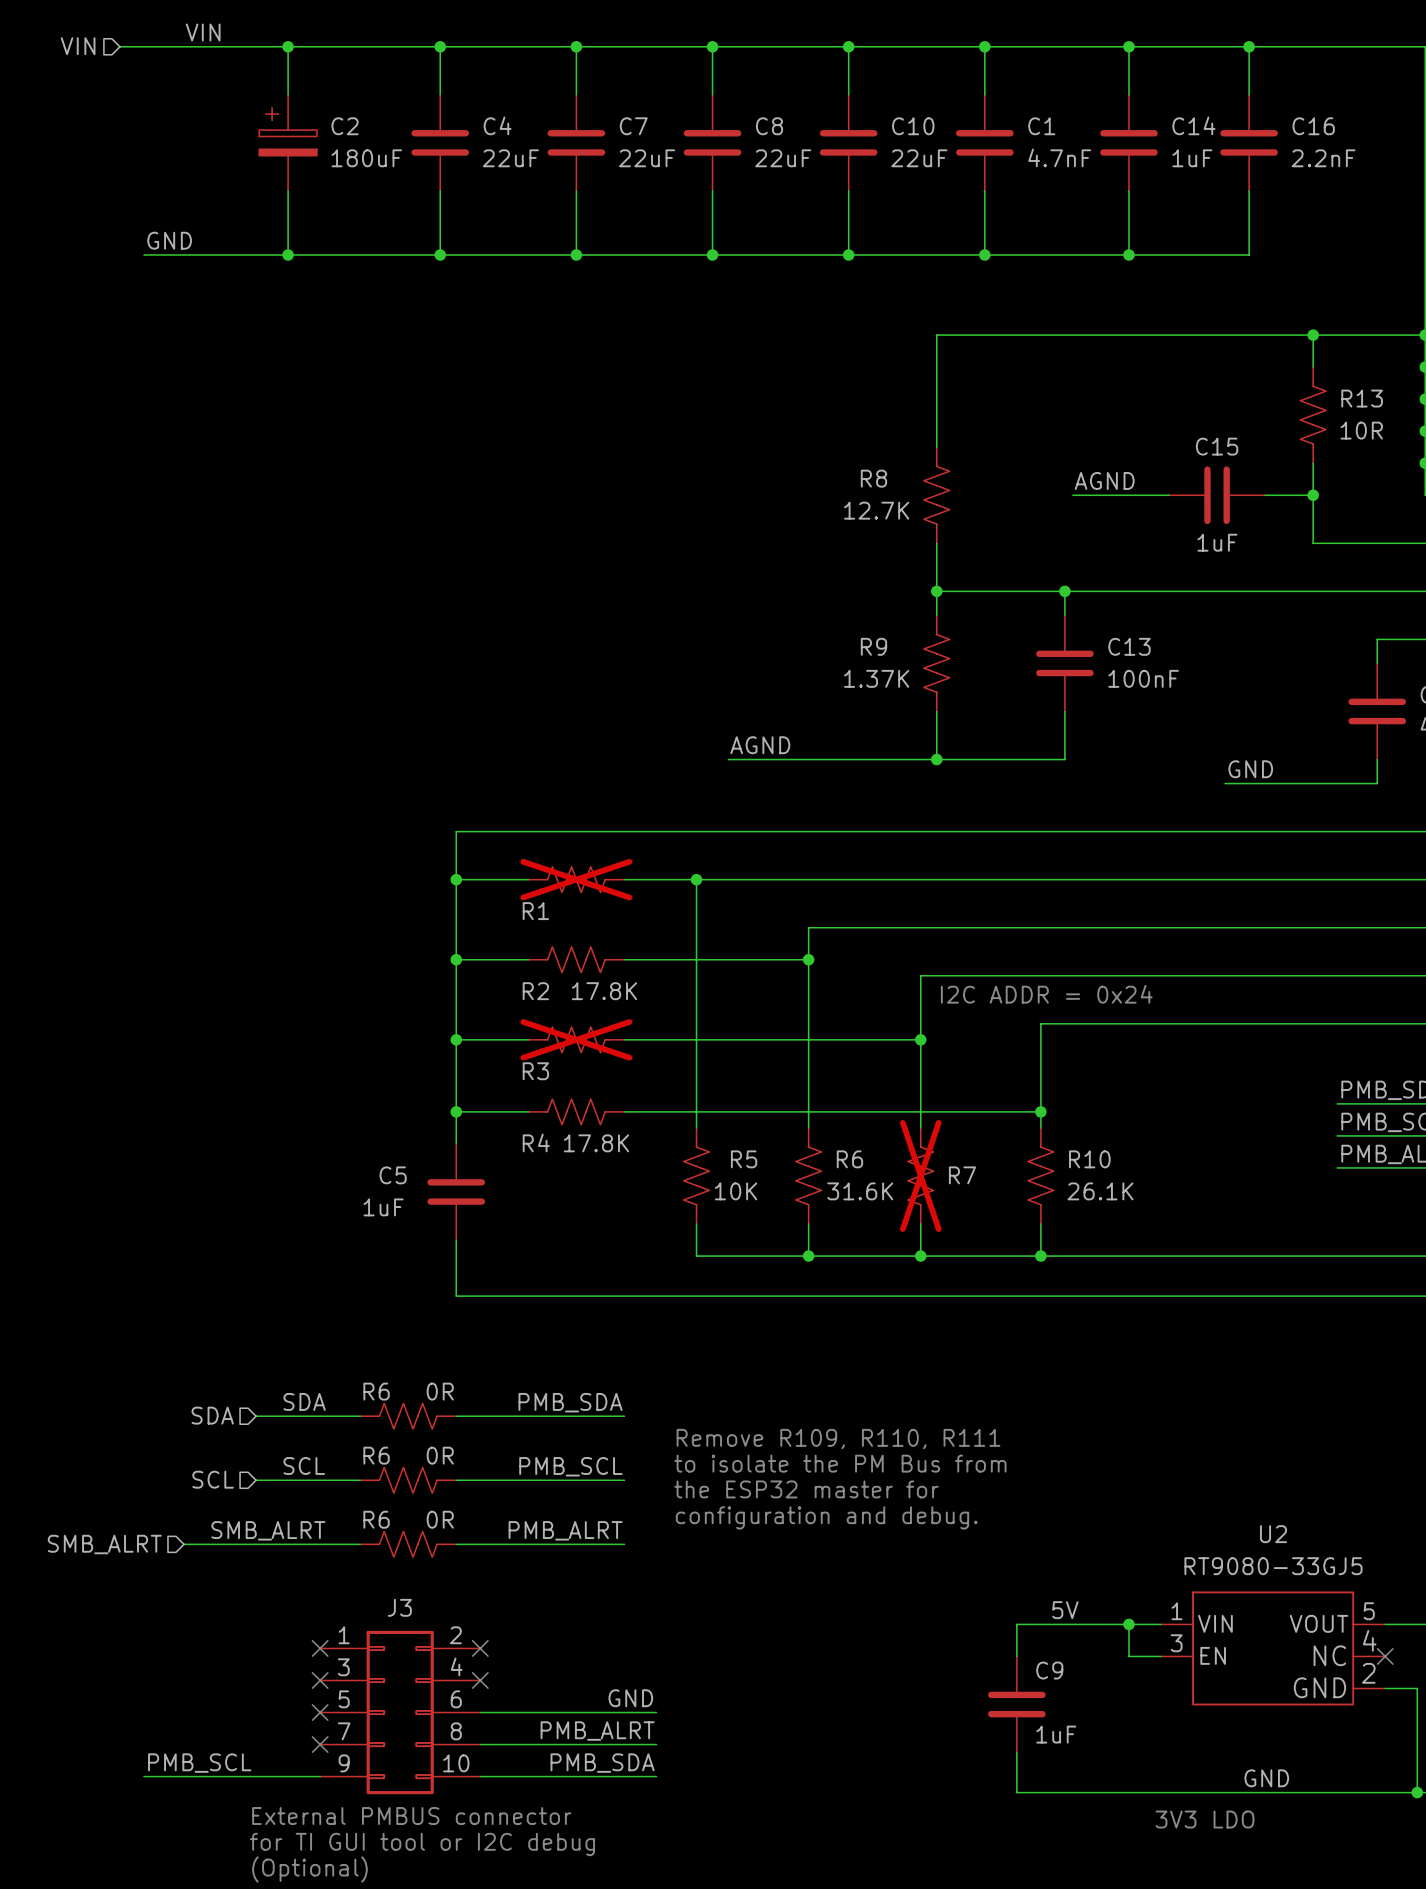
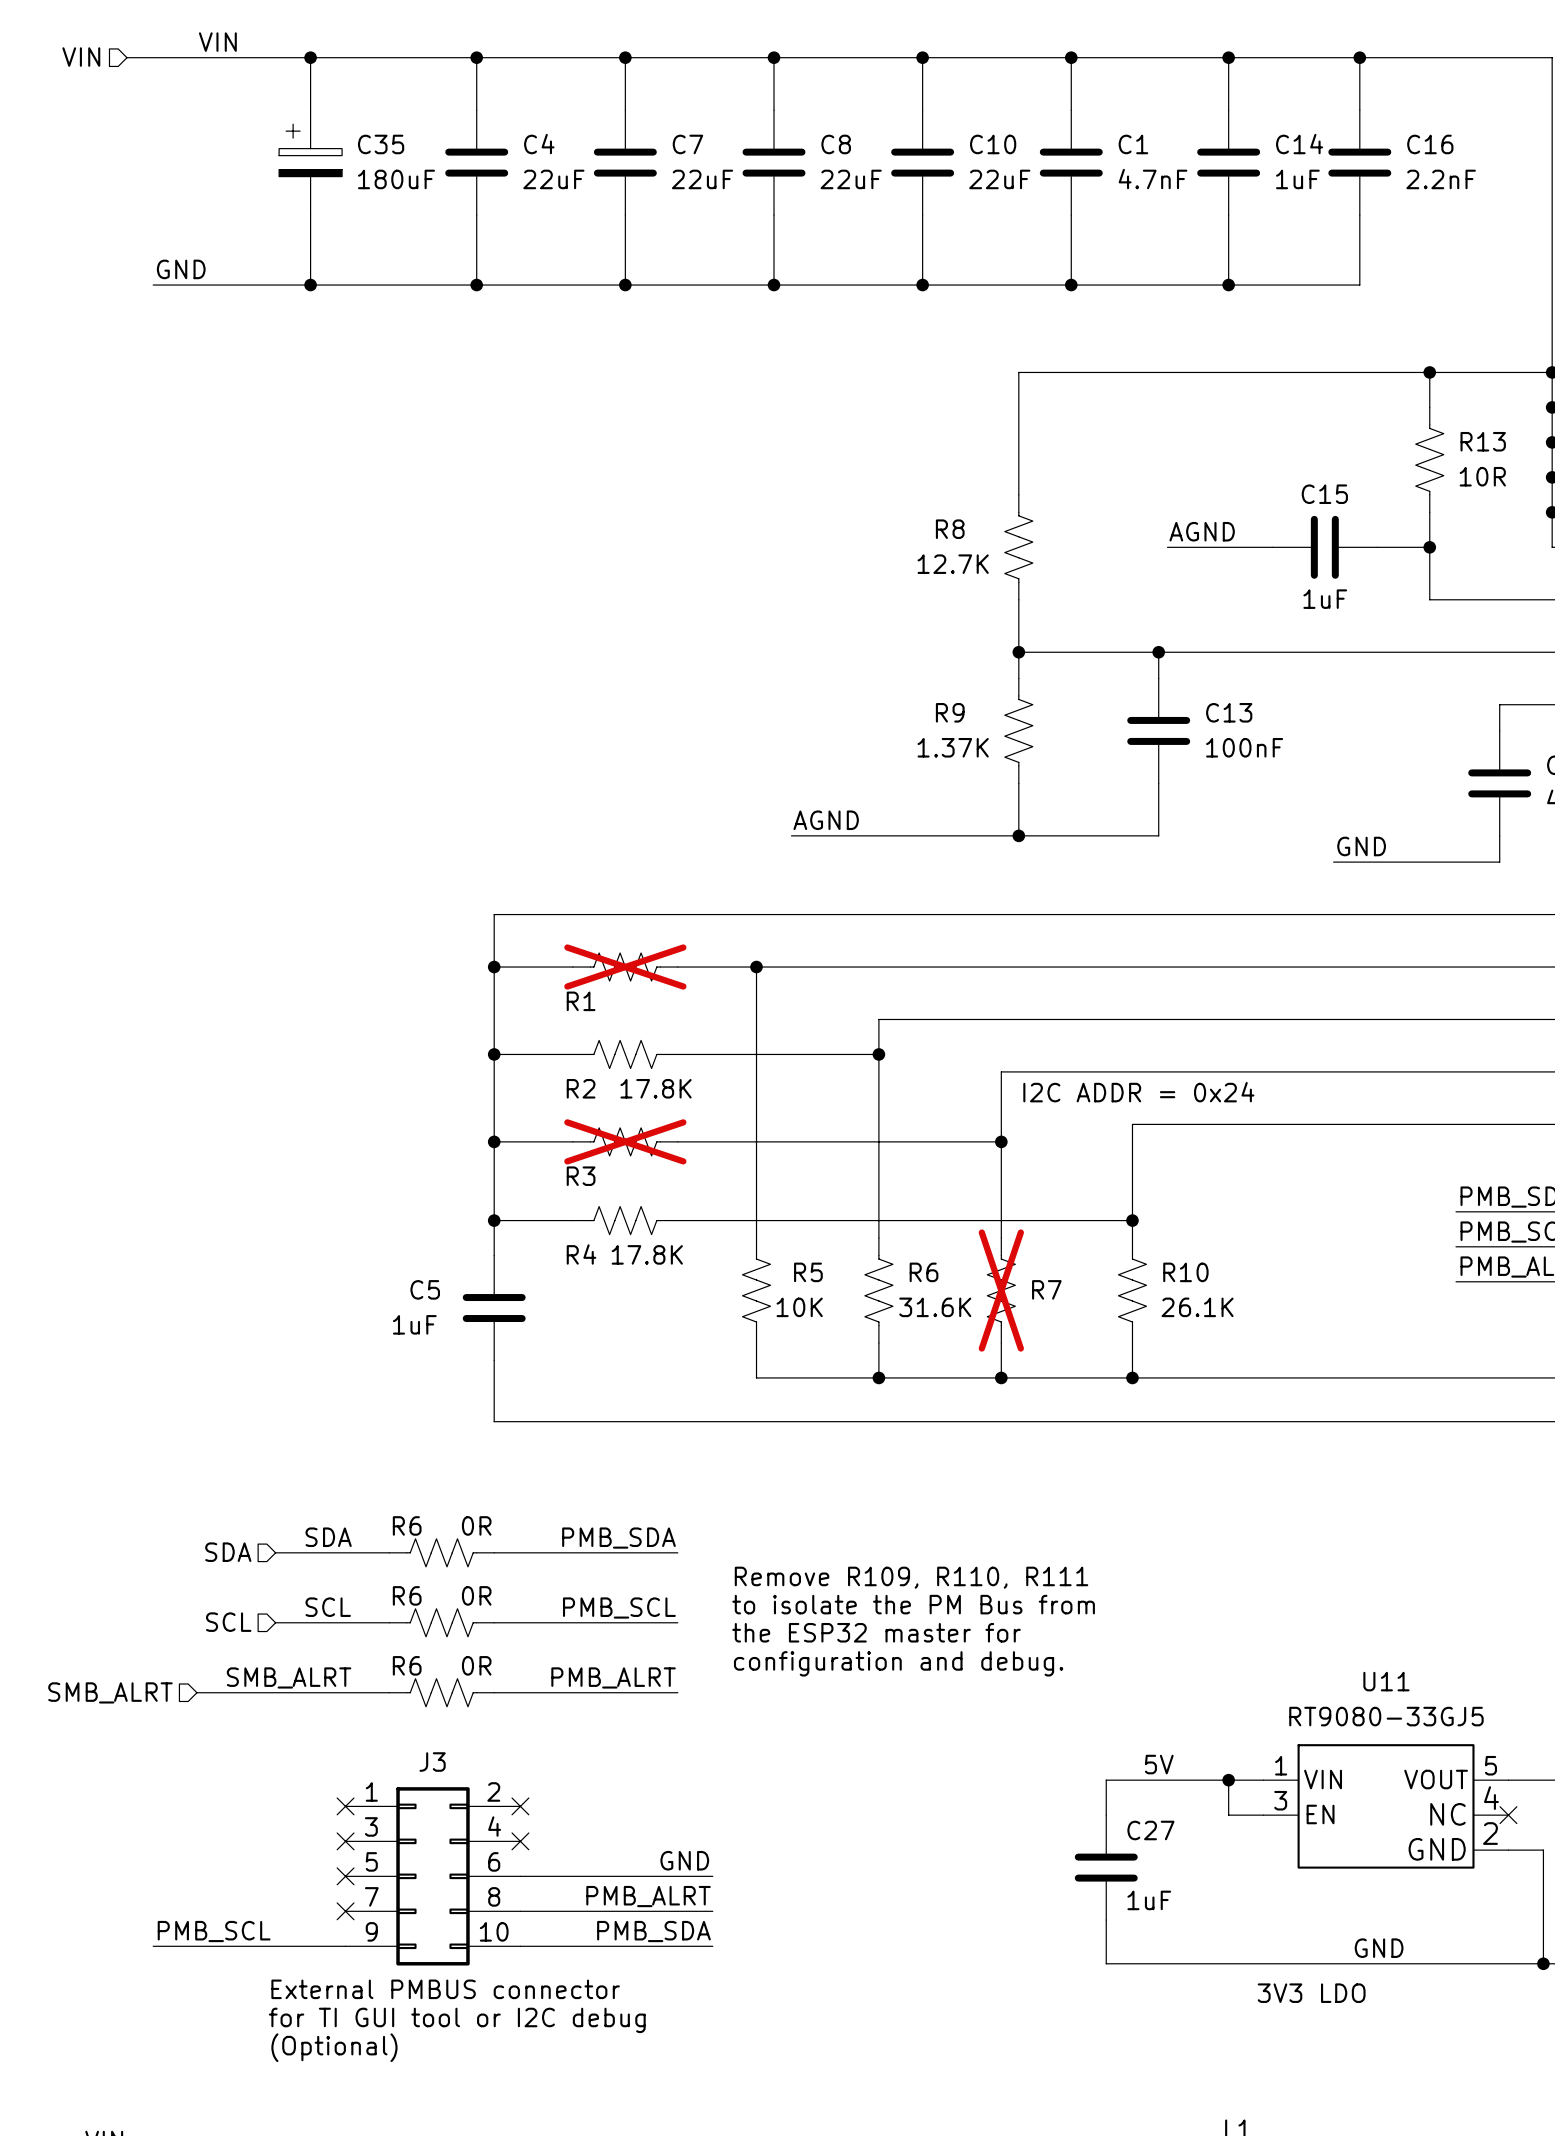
C2 name: C2 (345, 126) -> C35 (381, 144)
U2 name: U2 (1273, 1534) -> U11 (1386, 1681)
C9 name: C9 (1049, 1670) -> C27 (1150, 1830)

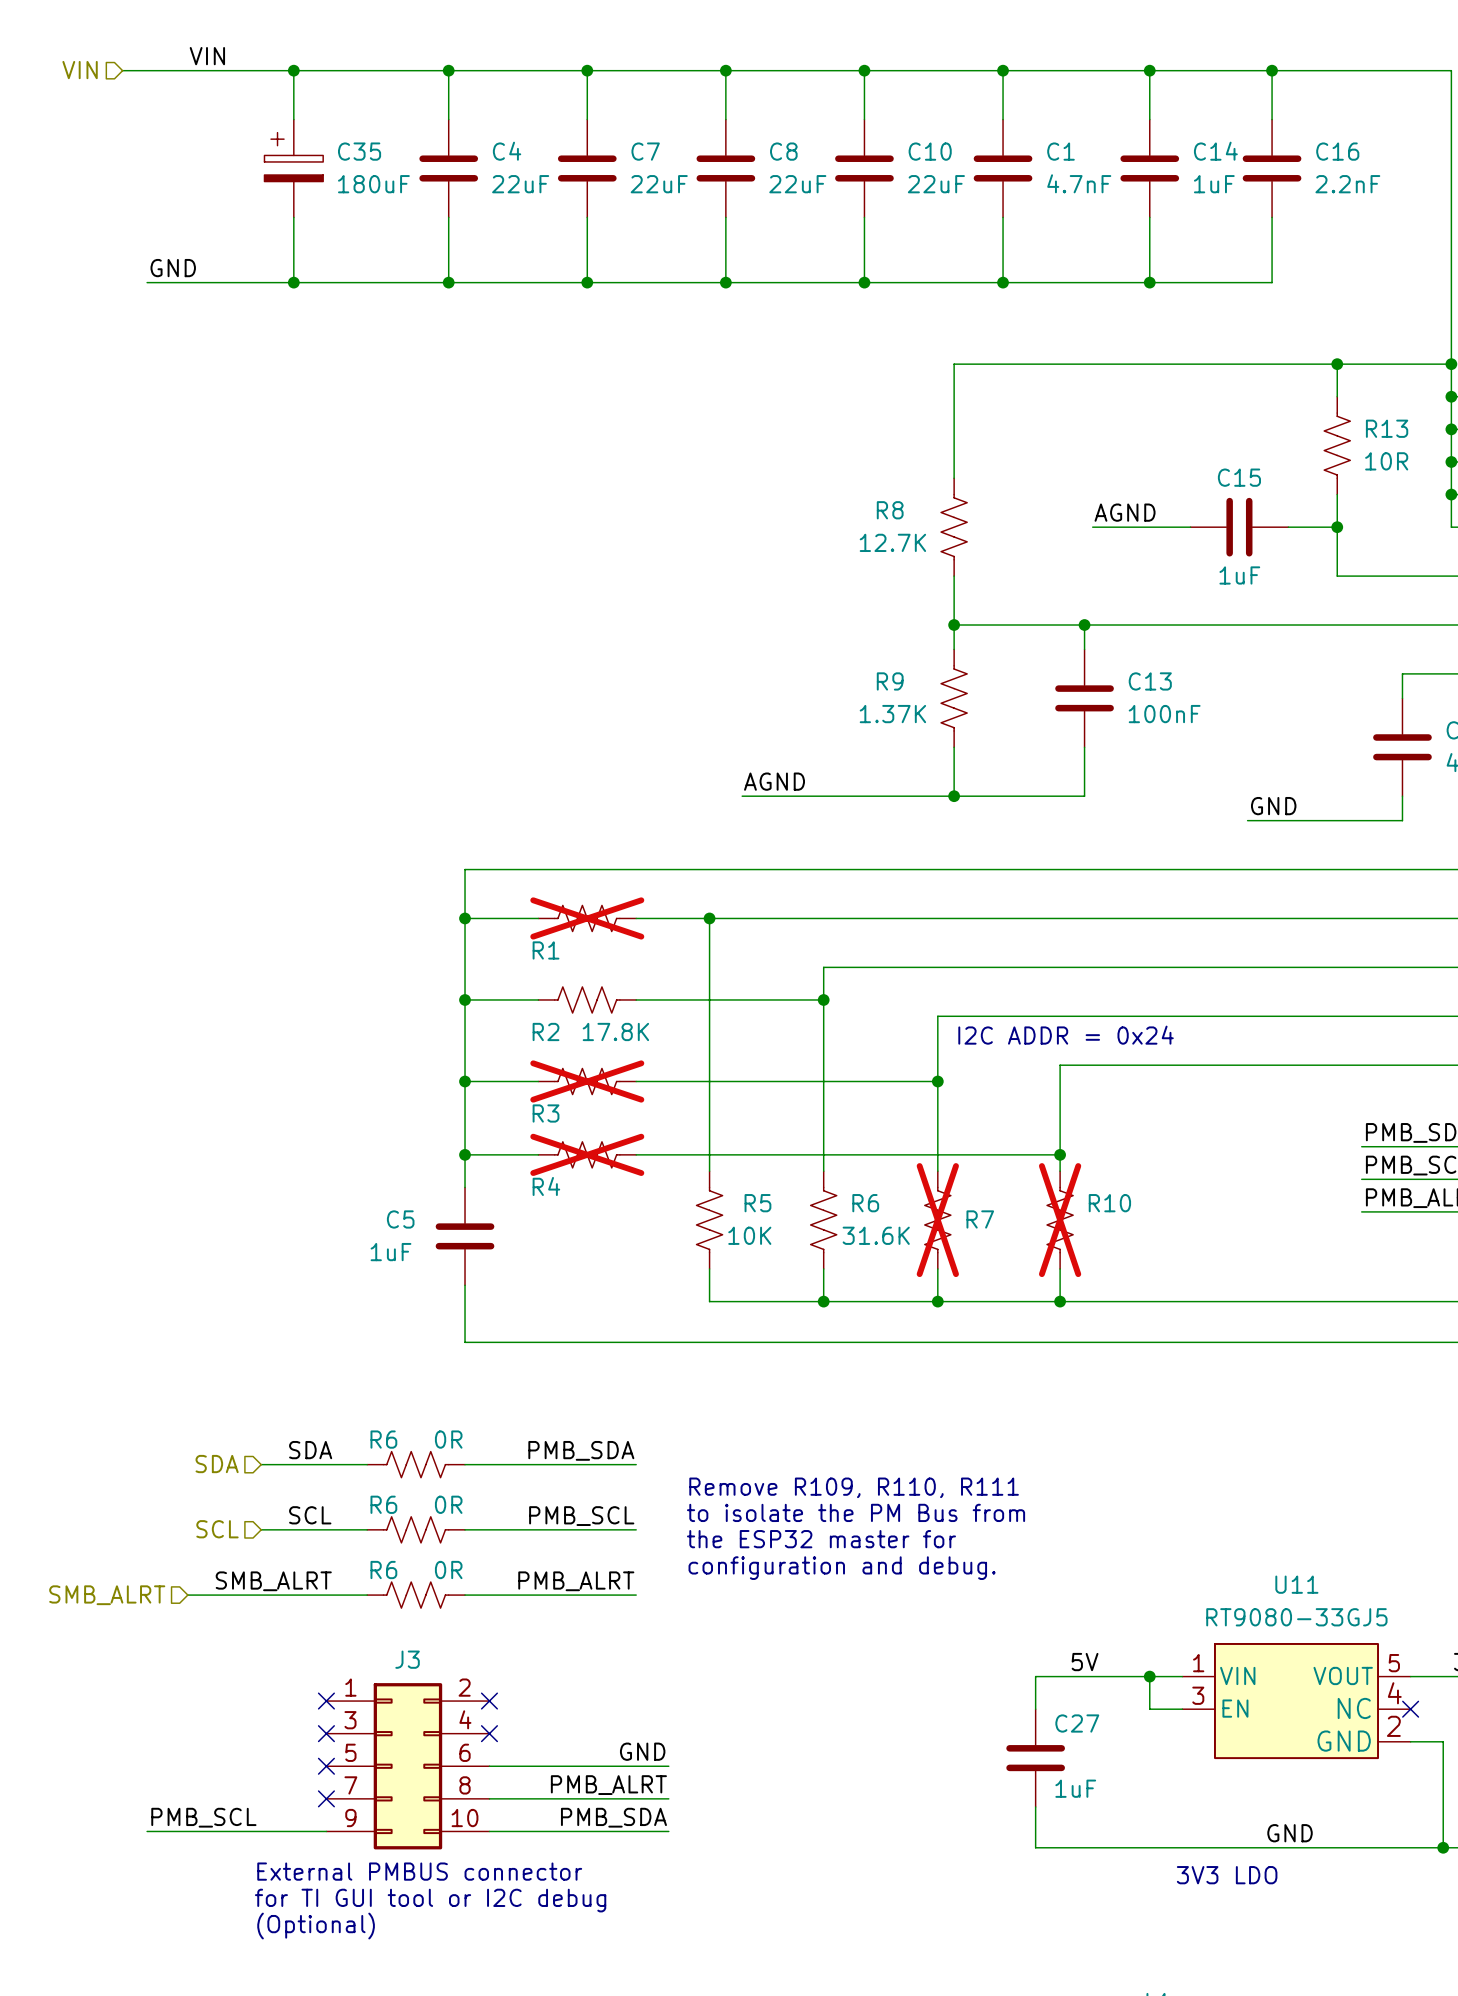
R4 do-not-place cross: none -> (587, 1154)
R4 value: 17.8K (647, 1254) -> none
R10 do-not-place cross: none -> (1060, 1220)
R10 value: 26.1K (1197, 1307) -> none

